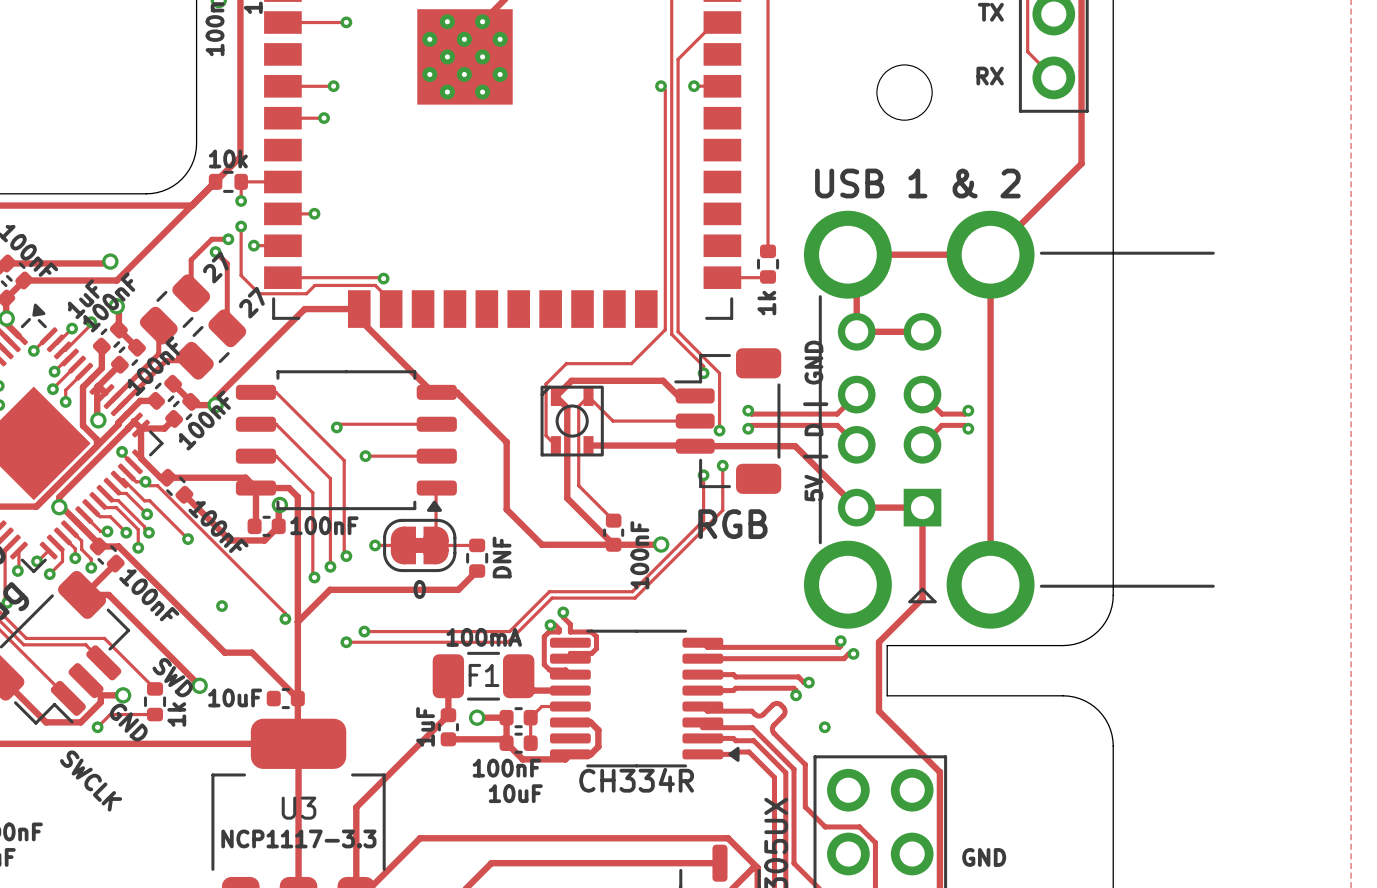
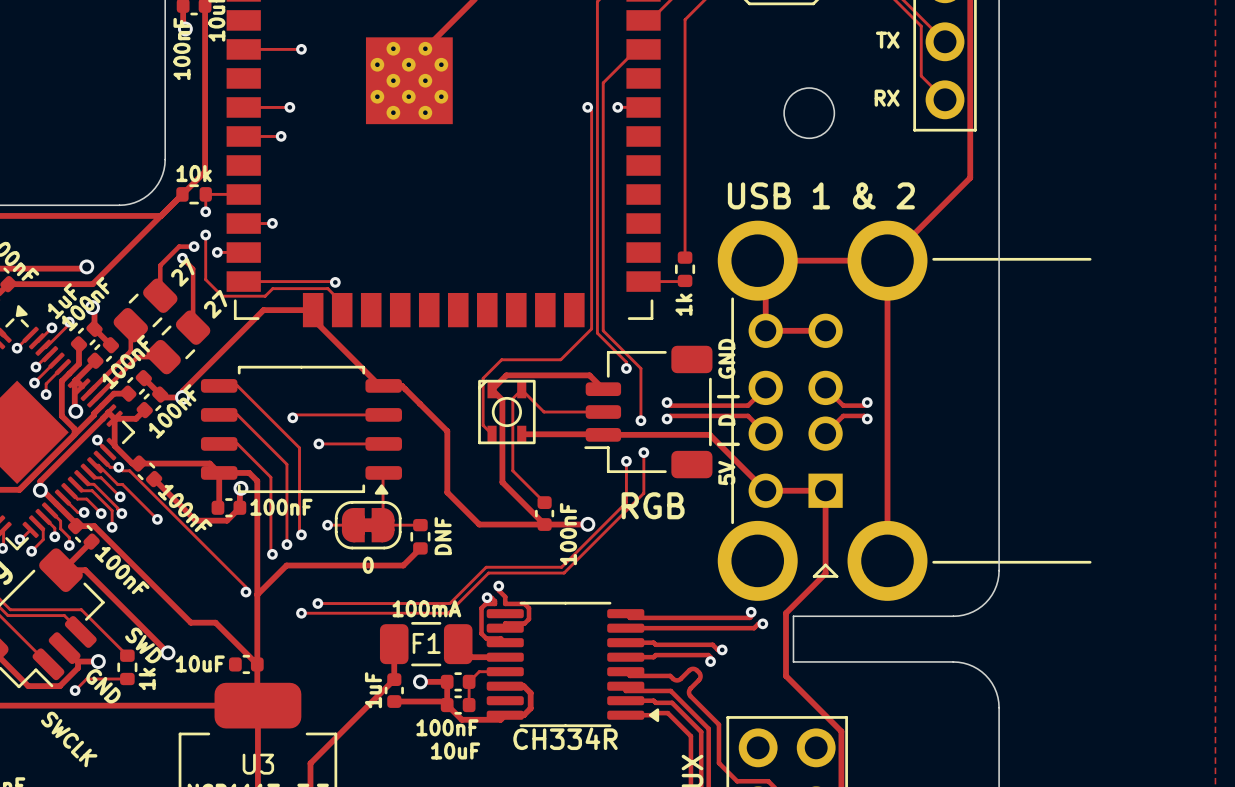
part footprint: [674, 348, 782, 494] -> [584, 345, 713, 479]
via: (221, 606) -> none
via: (824, 727) -> none

